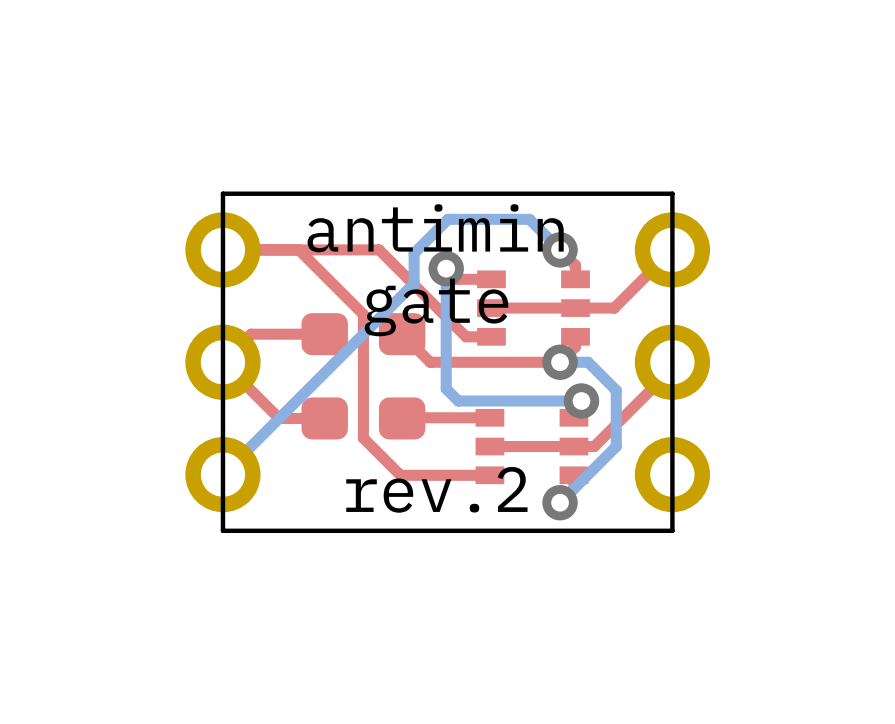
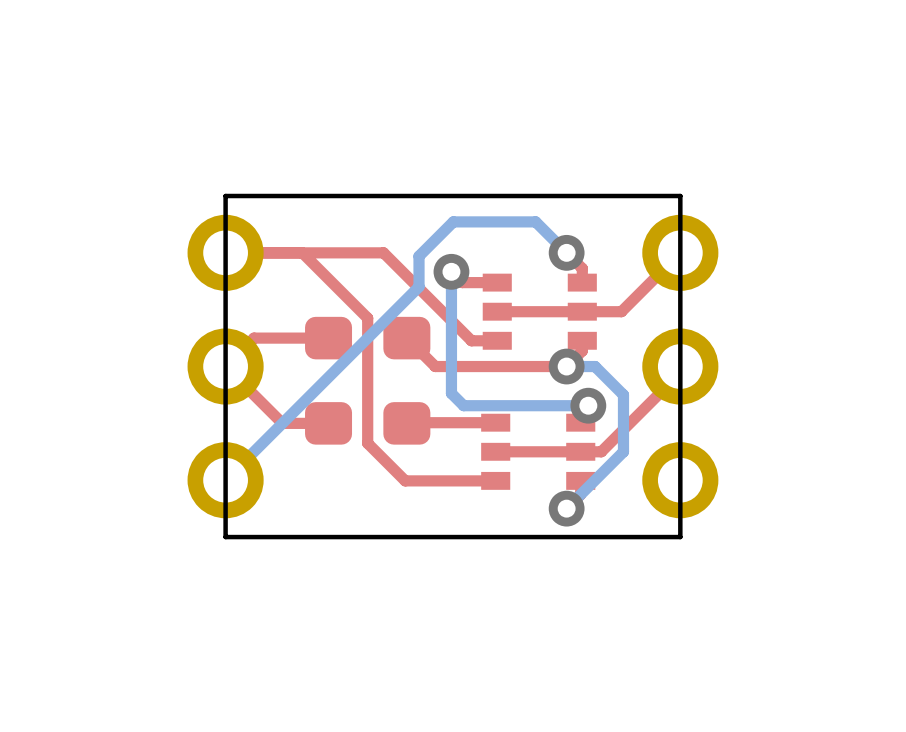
text: antimin (435, 228) -> none
text: gate (436, 307) -> none
text: rev.2 (436, 489) -> none

